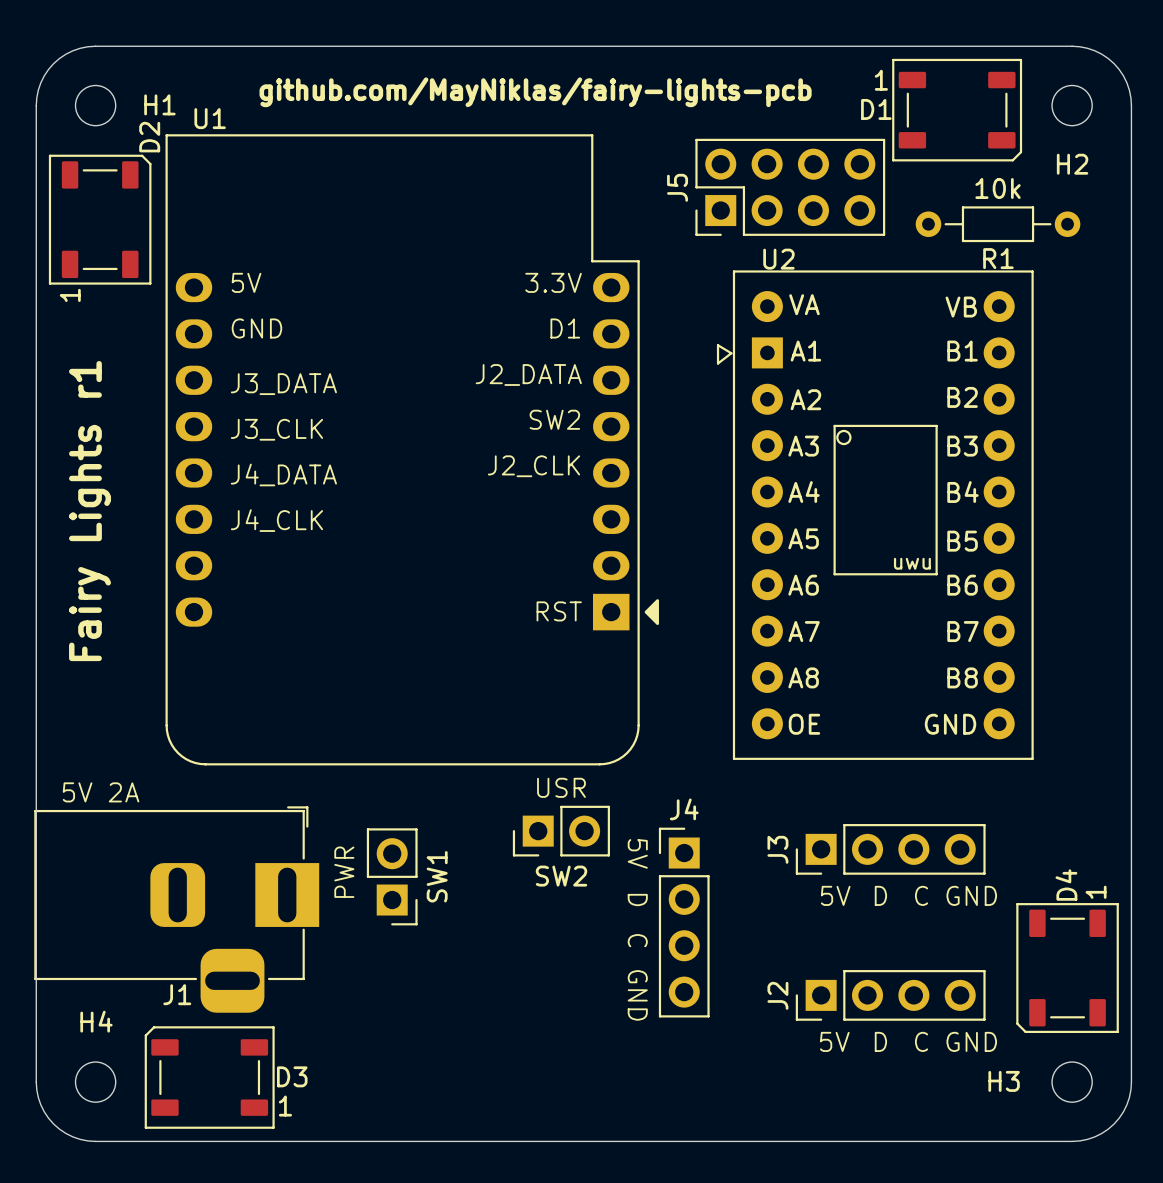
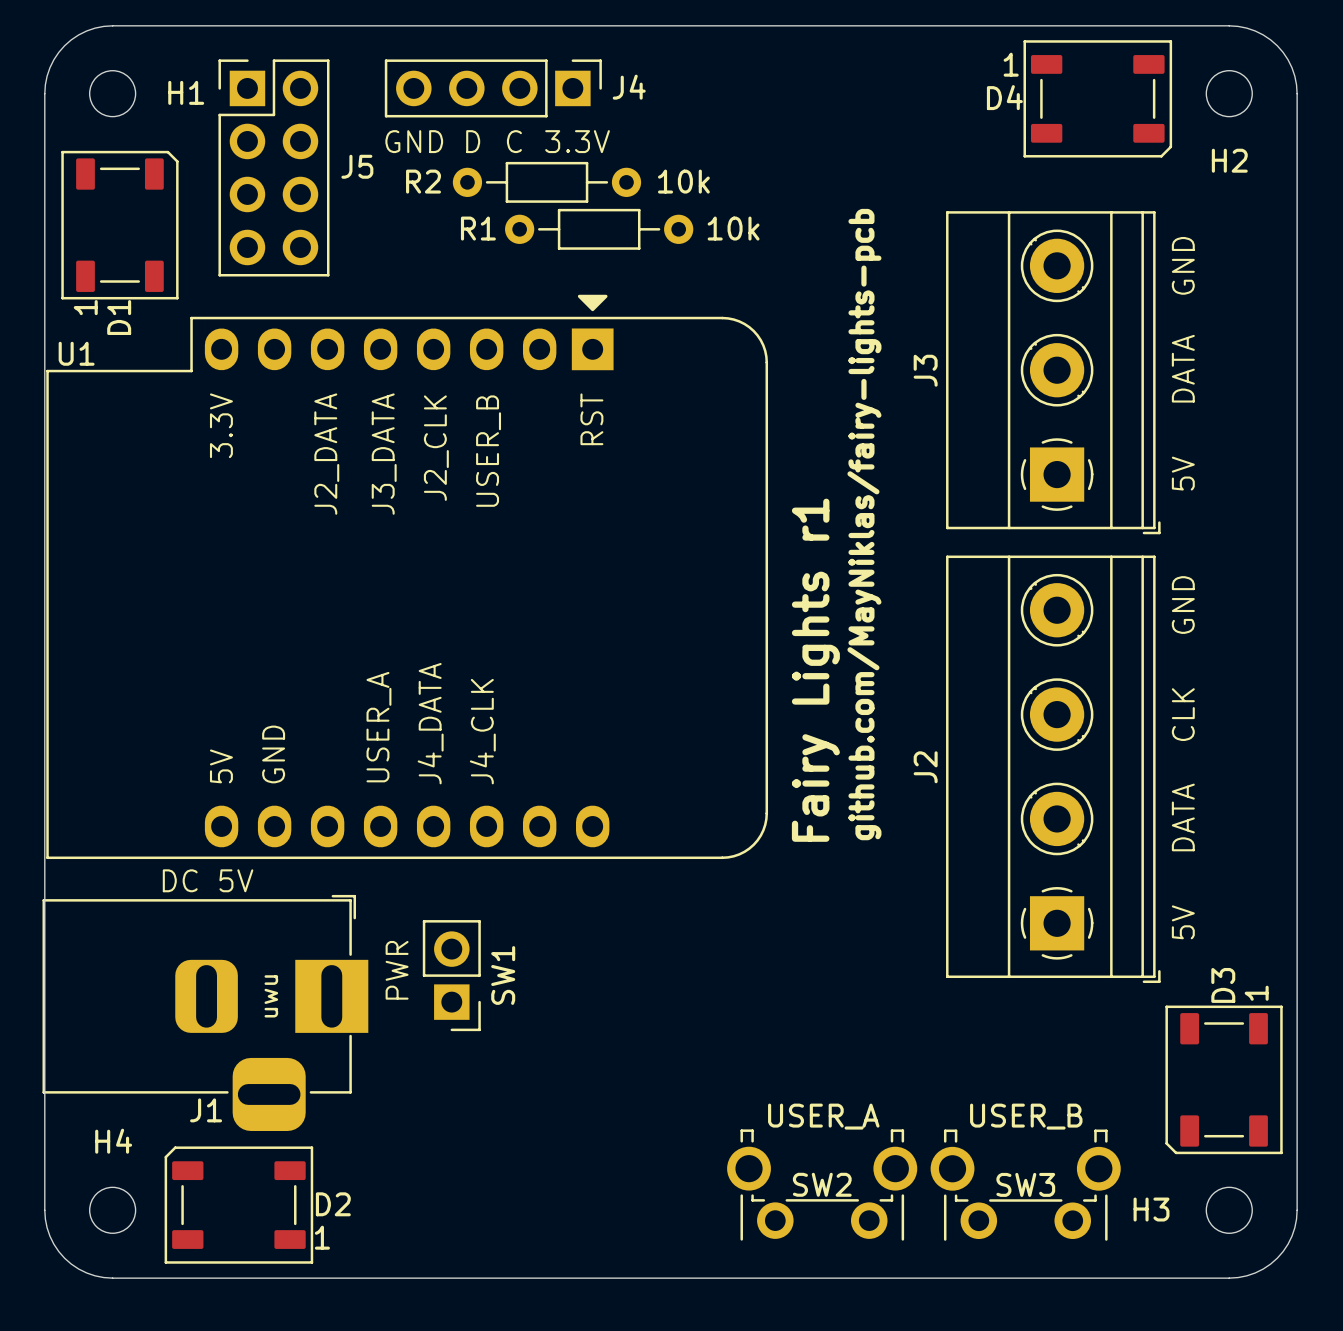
text: github.com/MayNiklas/fairy-lights-pcb (535, 92) -> none
D1 name: D1 (876, 109) -> D4 (1004, 97)
U1 name position: U1 (210, 118) -> U1 (76, 353)
D2 name position: D2 (149, 137) -> D2 (333, 1204)
text: none -> GND (414, 141)
text: none -> D (473, 141)
text: none -> C (514, 141)
D2 footprint: [48, 154, 152, 285] -> [164, 1146, 314, 1264]
R2: none -> 10k (546, 182)
J5 name position: J5 (677, 187) -> J5 (357, 166)
J5 rotation: 0° (790, 187) -> 90° clockwise (273, 167)
J5 position: (790, 187) -> (273, 167)
R1 value position: 10k (998, 188) -> 10k (733, 228)
D1: none -> (119, 225)
R1 position: (998, 224) -> (599, 229)
text: none -> GND (1183, 265)
R1 name position: R1 (998, 258) -> R1 (478, 228)
text: 5V (246, 282) -> none
text position: 3.3V (553, 282) -> 3.3V (577, 141)
text: GND (256, 328) -> none
text: D1 (565, 328) -> none
text: none -> DATA (1183, 368)
text rotation: 0° (528, 375) -> 90° counterclockwise (326, 454)
text position: J2_DATA (528, 375) -> J2_DATA (326, 454)
text rotation: 0° (283, 384) -> 90° counterclockwise (384, 454)
text: none -> 3.3V (221, 425)
text: none -> USER_B (488, 451)
text: SW2 (554, 419) -> none
text: J3_CLK (276, 429) -> none
text: none -> 5V (1183, 473)
U1 rotation: 0° (412, 449) -> 90° counterclockwise (407, 576)
text rotation: 0° (533, 466) -> 90° counterclockwise (436, 448)
text position: J2_CLK (533, 466) -> J2_CLK (436, 448)
text rotation: 0° (283, 474) -> 90° counterclockwise (430, 723)
text position: J4_DATA (283, 474) -> J4_DATA (430, 723)
text: none -> github.com/MayNiklas/fairy-lights-pcb (864, 524)
text: Fairy Lights r1 (90, 511) -> none
U2: (875, 515) -> none
text rotation: 0° (276, 520) -> 90° counterclockwise (482, 731)
text position: J4_CLK (276, 520) -> J4_CLK (482, 731)
text: none -> GND (1183, 605)
text: uwu (912, 563) -> none
text: none -> Fairy Lights r1 (815, 670)
text rotation: 0° (559, 611) -> 90° counterclockwise (591, 419)
text position: RST (559, 611) -> RST (591, 419)
text: none -> CLK (1183, 714)
text: none -> USER_A (378, 727)
text: none -> GND (273, 754)
text: none -> 5V (221, 766)
text: none -> DATA (1183, 817)
text: USR (561, 787) -> none
text: 5V 2A (101, 792) -> none
text: none -> DC 5V (208, 880)
SW2 footprint: [512, 805, 610, 857] -> [727, 1129, 918, 1241]
J3 footprint: [795, 824, 986, 875] -> [946, 211, 1161, 535]
text: none -> 5V (1183, 922)
text: 5V (637, 853) -> none
SW2 name position: SW2 (561, 876) -> SW2 (822, 1184)
D4 name: D4 (1066, 885) -> D3 (1223, 985)
text: none -> uwu (271, 996)
text: 5V (835, 895) -> none
text: D (880, 895) -> none
text: C (921, 895) -> none
text: GND (971, 895) -> none
text: D (637, 900) -> none
J4 rotation: 0° (684, 922) -> 90° clockwise (493, 88)
J4 position: (684, 922) -> (493, 88)
text: C (637, 940) -> none
J2 footprint: [795, 970, 986, 1021] -> [946, 555, 1161, 984]
text: GND (637, 995) -> none
SW2 value: none -> USER_A (823, 1116)
text: 5V (834, 1041) -> none
text: D (880, 1041) -> none
text: C (921, 1041) -> none
text: GND (971, 1041) -> none
SW3: none -> USER_B (1025, 1185)
D3: (209, 1077) -> none

